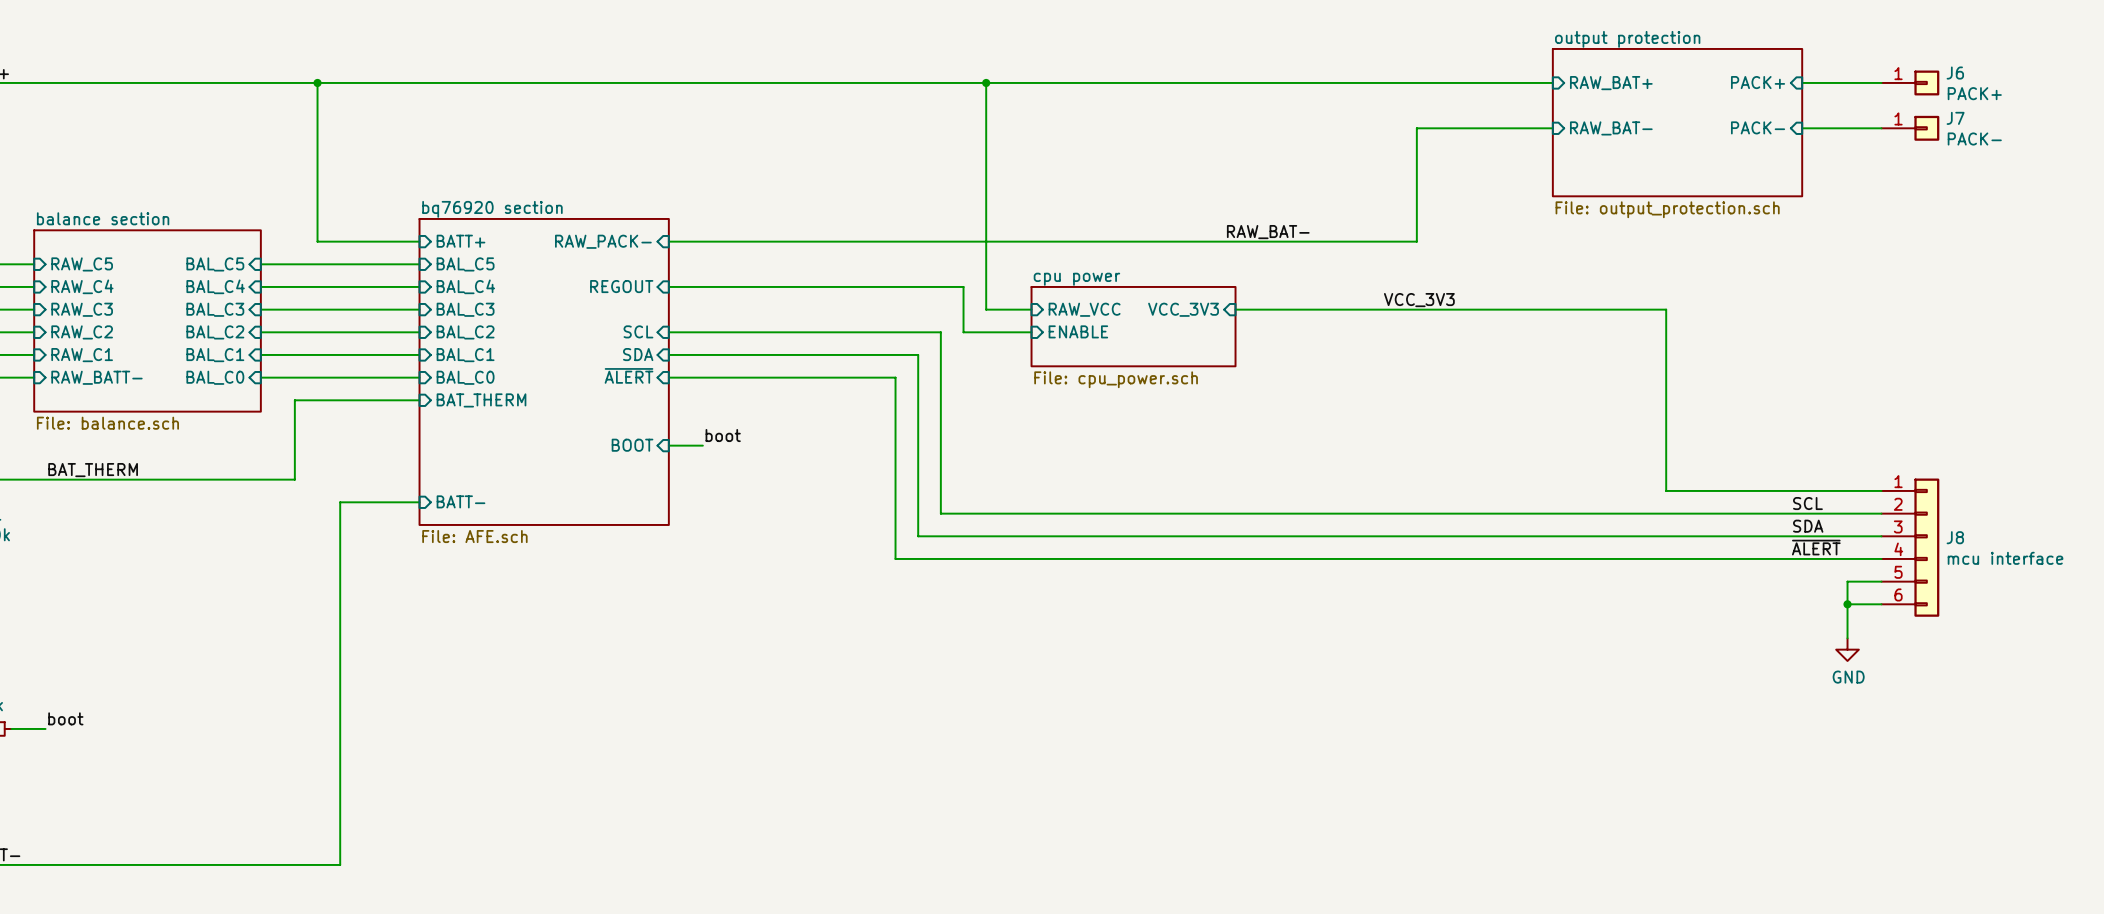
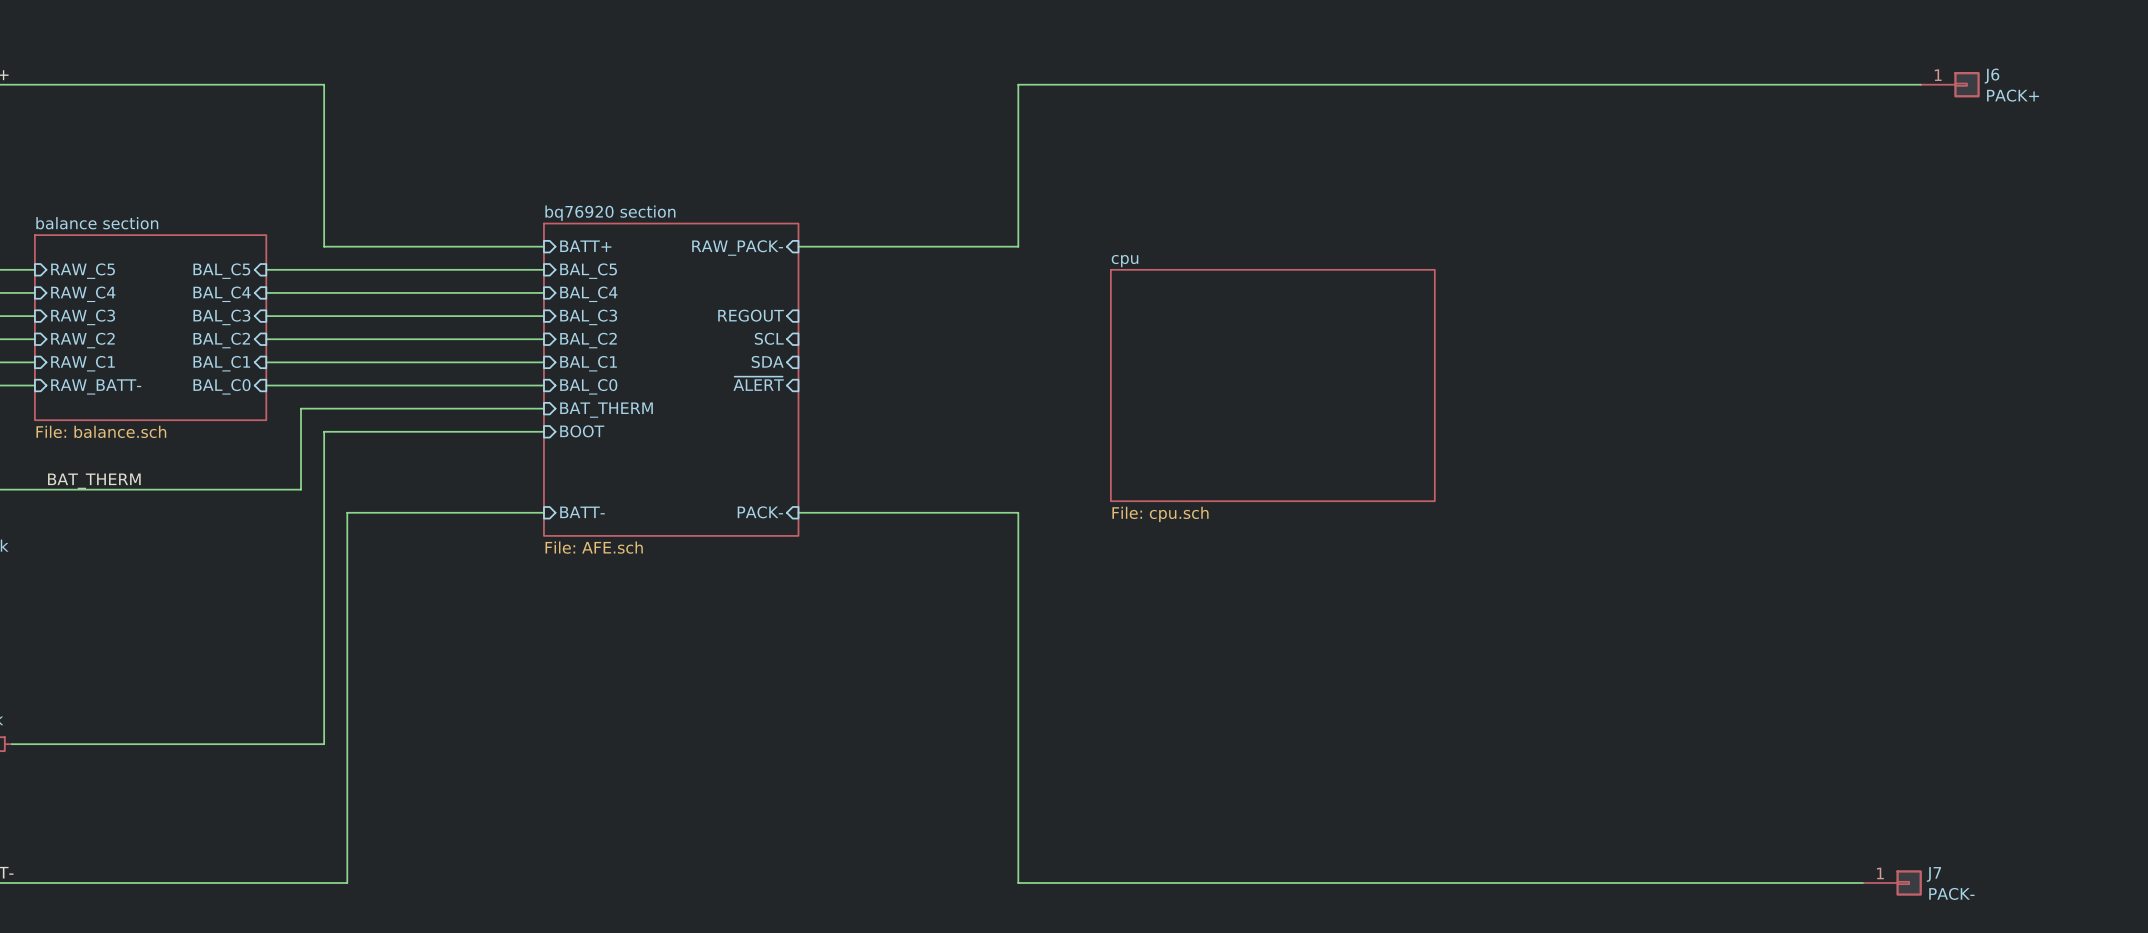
wire: (317, 82) (997, 82) -> none
junction: (317, 82) -> none
wire: (986, 82) (986, 309) (1031, 309) -> none
junction: (986, 82) -> none
wire: none -> (1585, 84) (1839, 84)
sheet pin: PACK+ (1758, 82) -> none
sheet pin: RAW_BAT+ (1611, 83) -> none
sheet output protection: File: output_protection.sch (1677, 122) -> none
sheet pin: PACK- (1758, 127) -> none
wire: (1552, 128) (1416, 128) (1416, 241) (997, 241) -> (1018, 84) (1018, 246)
sheet pin: RAW_BAT- (1611, 128) -> none
wire: (1802, 128) (1881, 128) -> none
J7 position: (1910, 128) -> (1892, 883)
label: RAW_BAT- (1268, 232) -> none
wire: none -> (428, 246) (543, 246)
sheet pin position: BATT+ (460, 241) -> BATT+ (585, 246)
sheet pin position: RAW_PACK- (603, 241) -> RAW_PACK- (737, 248)
wire: (668, 241) (782, 241) -> none
wire: none -> (428, 269) (543, 269)
sheet pin position: BAL_C5 (465, 264) -> BAL_C5 (588, 271)
wire: none -> (428, 292) (543, 292)
sheet pin position: BAL_C4 (465, 286) -> BAL_C4 (588, 294)
sheet pin position: REGOUT (621, 286) -> REGOUT (751, 315)
wire: (668, 286) (963, 286) (963, 332) (1031, 332) -> none
label: VCC_3V3 (1419, 300) -> none
wire: none -> (428, 316) (543, 316)
sheet pin position: BAL_C3 (465, 309) -> BAL_C3 (588, 317)
sheet pin: RAW_VCC (1084, 309) -> none
sheet pin: VCC_3V3 (1183, 309) -> none
wire: (1235, 309) (1666, 309) (1666, 490) (1881, 490) -> none
sheet cpu power: File: cpu_power.sch (1133, 326) -> none
sheet pin position: SCL (638, 331) -> SCL (769, 338)
sheet pin: ENABLE (1078, 331) -> none
wire: none -> (428, 339) (543, 339)
sheet pin position: BAL_C2 (465, 332) -> BAL_C2 (588, 340)
wire: (668, 332) (940, 332) (940, 513) (1881, 513) -> none
wire: none -> (428, 362) (543, 362)
sheet pin position: SDA (638, 354) -> SDA (767, 361)
wire: (668, 354) (918, 354) (918, 536) (1881, 536) -> none
sheet pin position: BAL_C1 (465, 355) -> BAL_C1 (588, 363)
sheet bq76920 section position: (544, 371) -> (671, 379)
sheet pin position: ~{ALERT} (629, 375) -> ~{ALERT} (758, 383)
wire: none -> (428, 385) (543, 385)
sheet pin position: BAL_C0 (465, 377) -> BAL_C0 (588, 386)
wire: (668, 377) (895, 377) (895, 558) (1881, 558) -> none
sheet cpu: none -> File: cpu.sch (1272, 385)
wire: none -> (428, 408) (543, 408)
sheet pin position: BAT_THERM (481, 400) -> BAT_THERM (606, 410)
wire: none -> (543, 431) (324, 431) (324, 744) (46, 744)
label: boot (723, 435) -> none
sheet pin rotation: 0° (632, 445) -> 180° (582, 431)
sheet pin position: BOOT (632, 445) -> BOOT (582, 431)
wire: (668, 445) (702, 445) -> none
sheet pin position: BATT- (460, 501) -> BATT- (582, 512)
sheet pin: none -> PACK- (760, 512)
wire: none -> (428, 512) (543, 512)
wire: none -> (798, 512) (1018, 512) (1018, 883) (1862, 883)
label: SCL (1807, 503) -> none
label: SDA (1808, 526) -> none
label: ~{ALERT} (1816, 547) -> none
J8: mcu interface (1910, 547) -> none
wire: (1881, 581) (1847, 581) (1847, 638) -> none
wire: (1847, 604) (1881, 604) -> none
junction: (1847, 604) -> none
power symbol: GND (1847, 649) -> none
label: boot (65, 718) -> none

